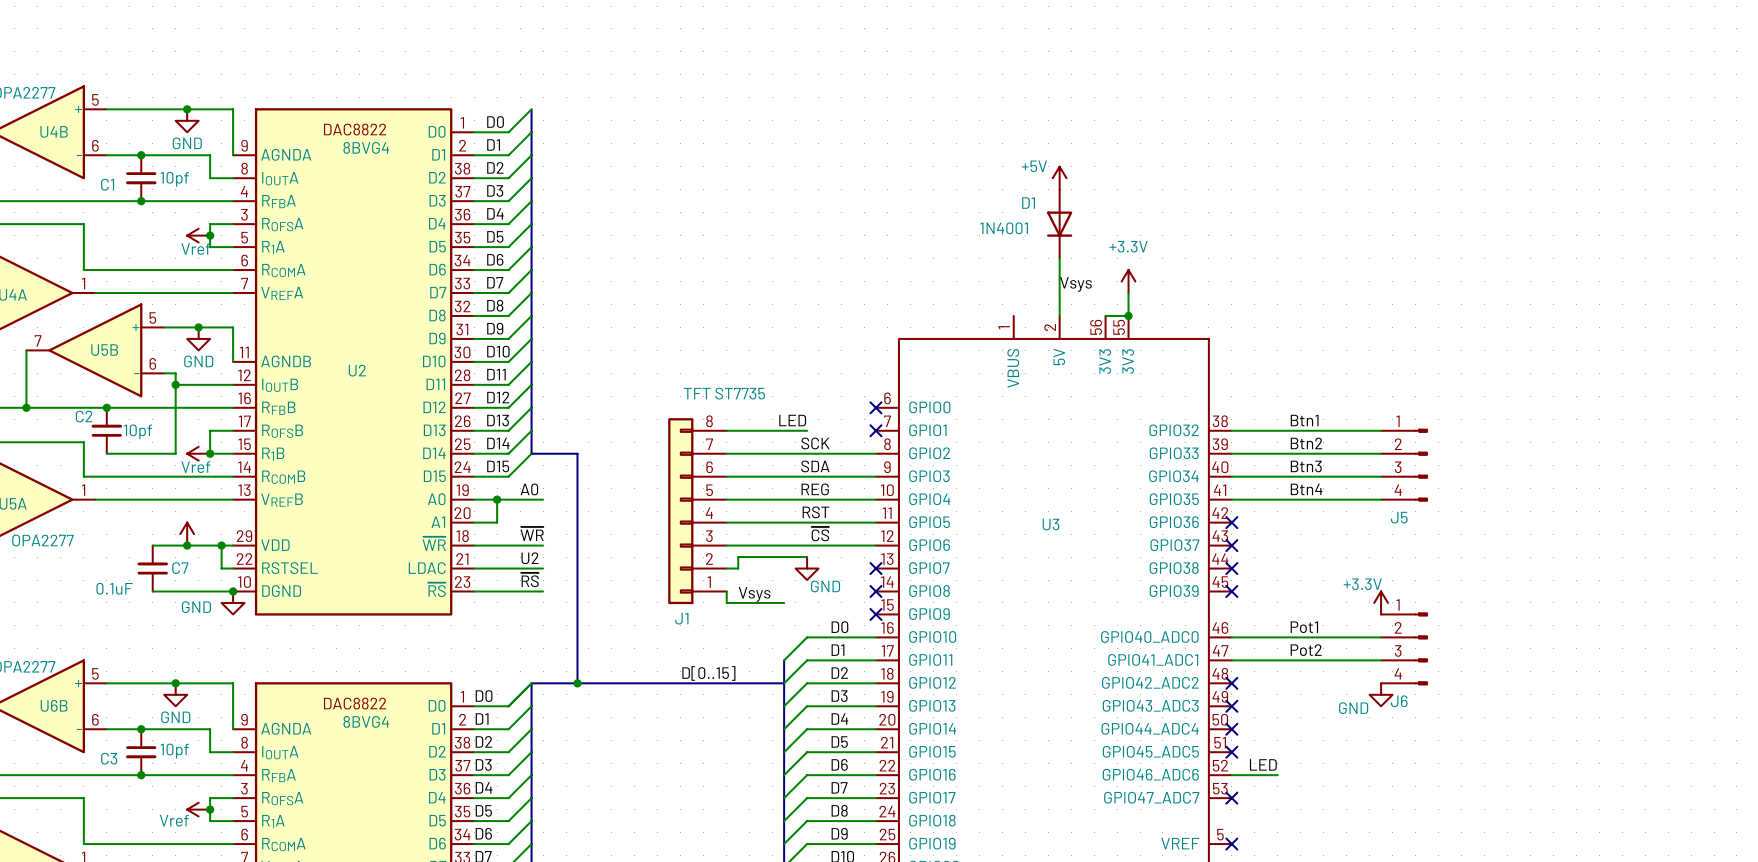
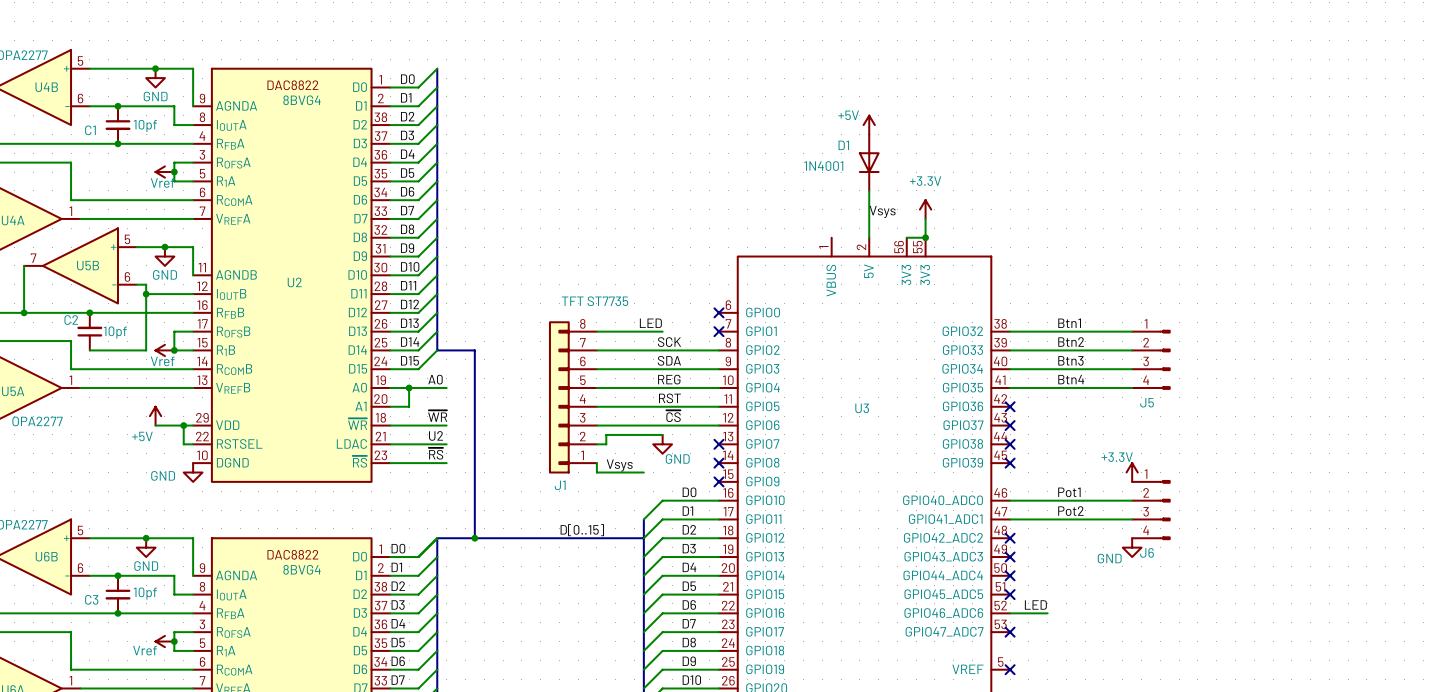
wire: (152, 545) (187, 545) -> none
junction: (187, 545) -> none
power symbol text: none -> +5V (142, 436)
C7: 0.1uF (152, 568) -> none
wire: (152, 591) (233, 591) -> none
junction: (233, 591) -> none

